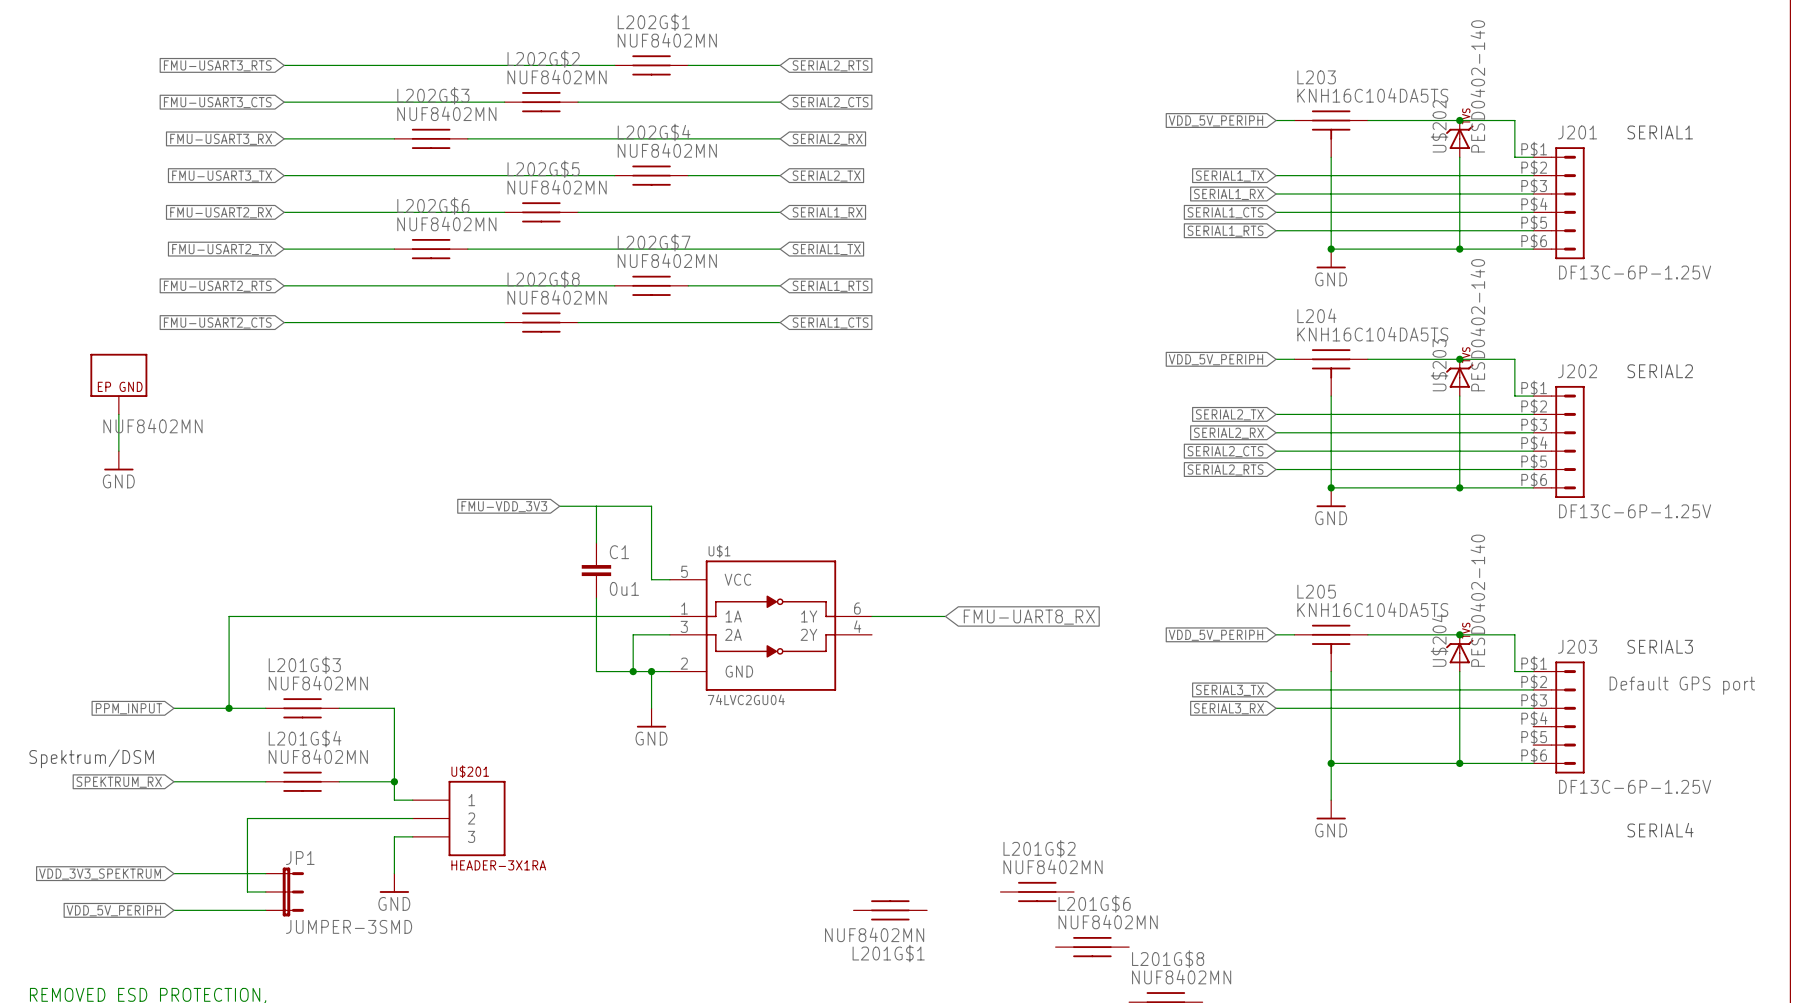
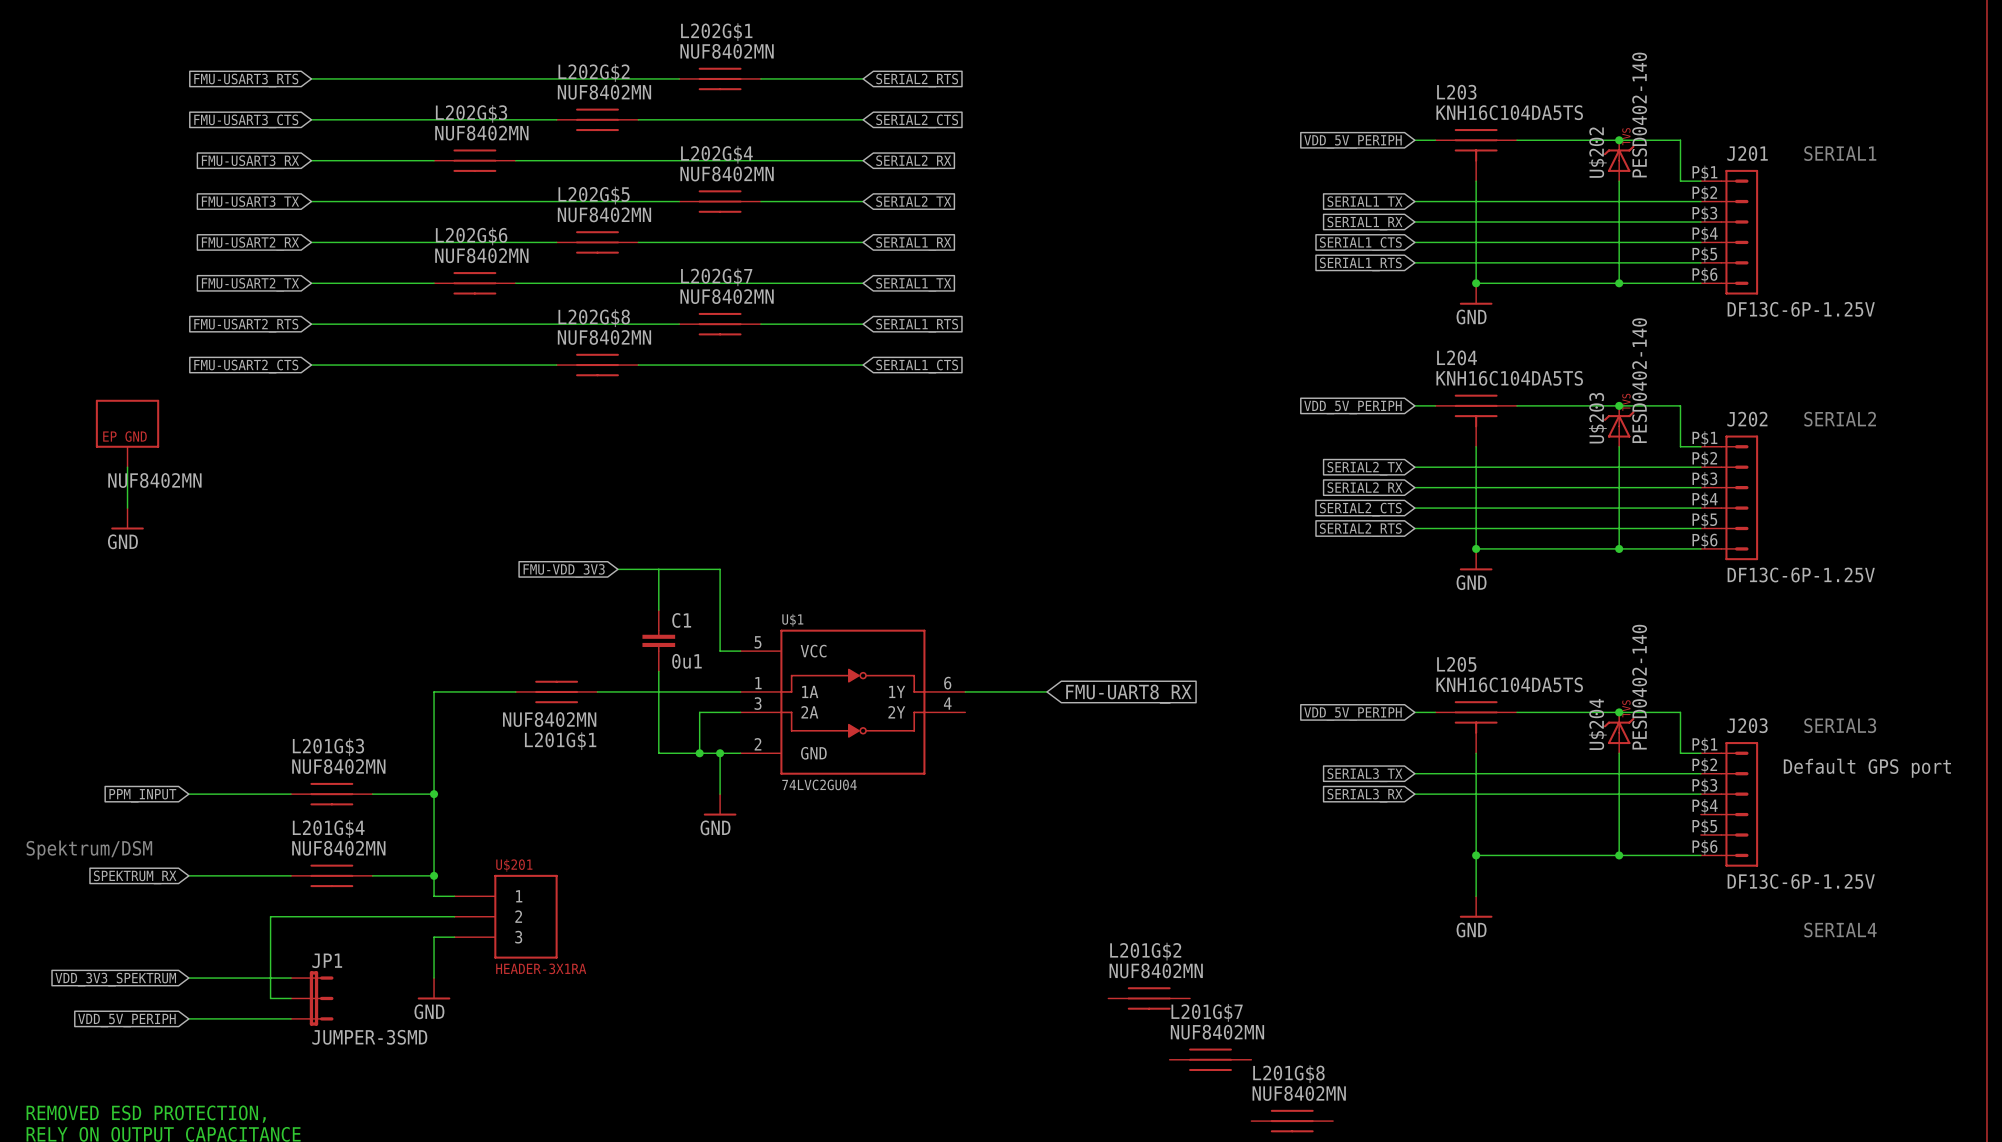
wire: (394, 616) (229, 616) (229, 708) -> (434, 691) (434, 794)
junction: (229, 708) -> none
junction: none -> (434, 794)
L201G$6 name: L201G$6 (1094, 903) -> L201G$7 (1207, 1012)
L201G$1 position: (890, 910) -> (556, 691)

